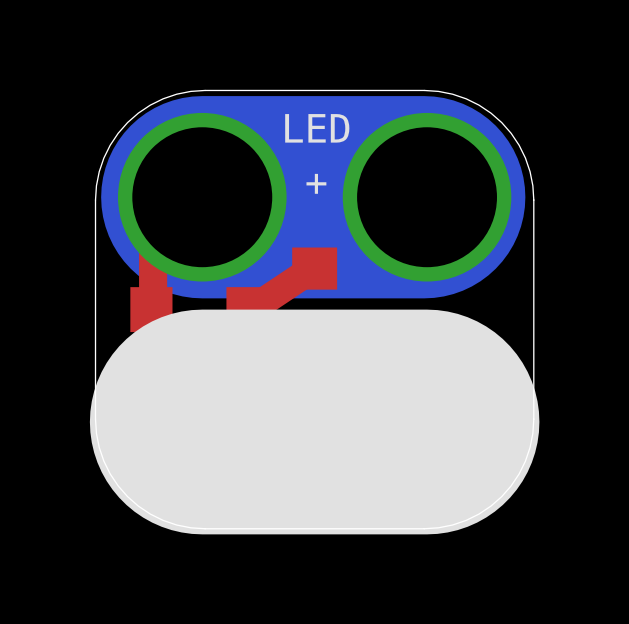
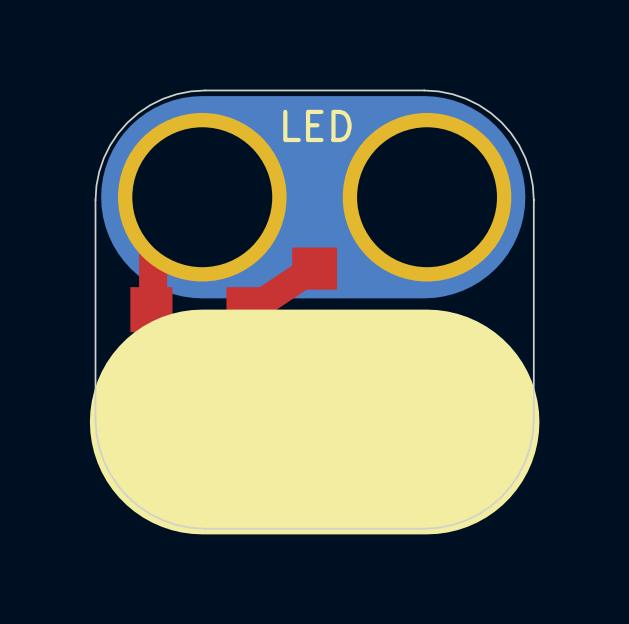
part footprint: [89, 89, 540, 535] -> [89, 89, 540, 535]
text: LED (317, 128) -> none

